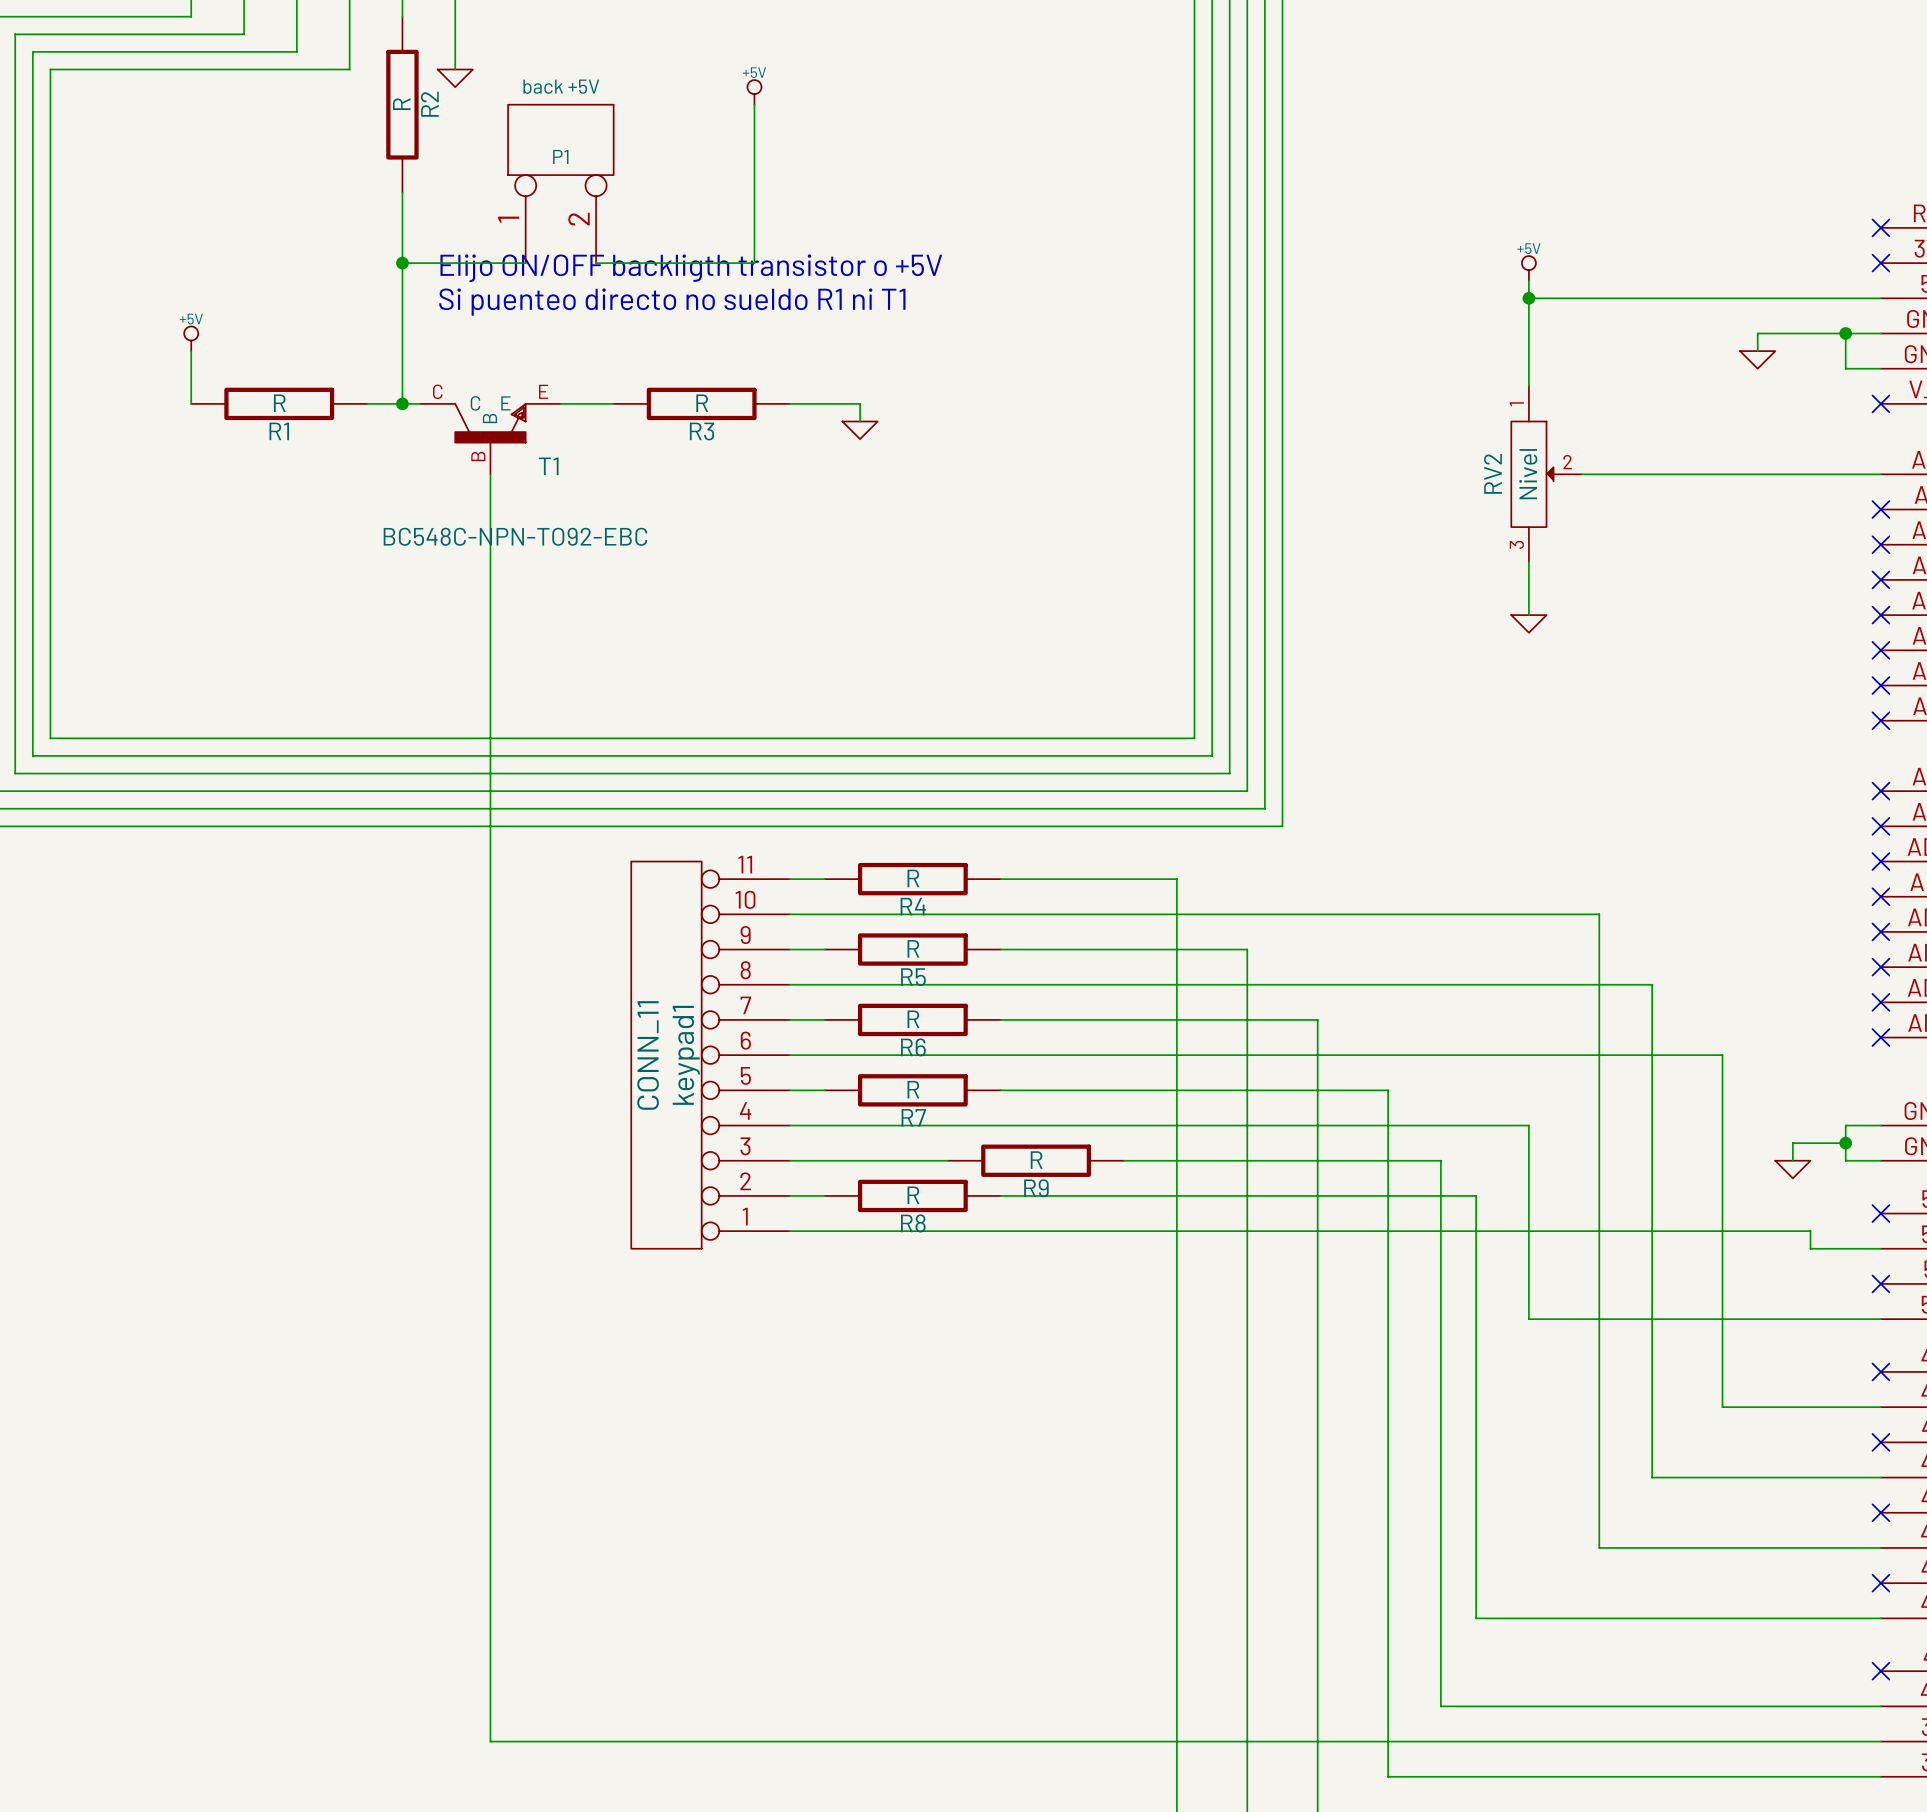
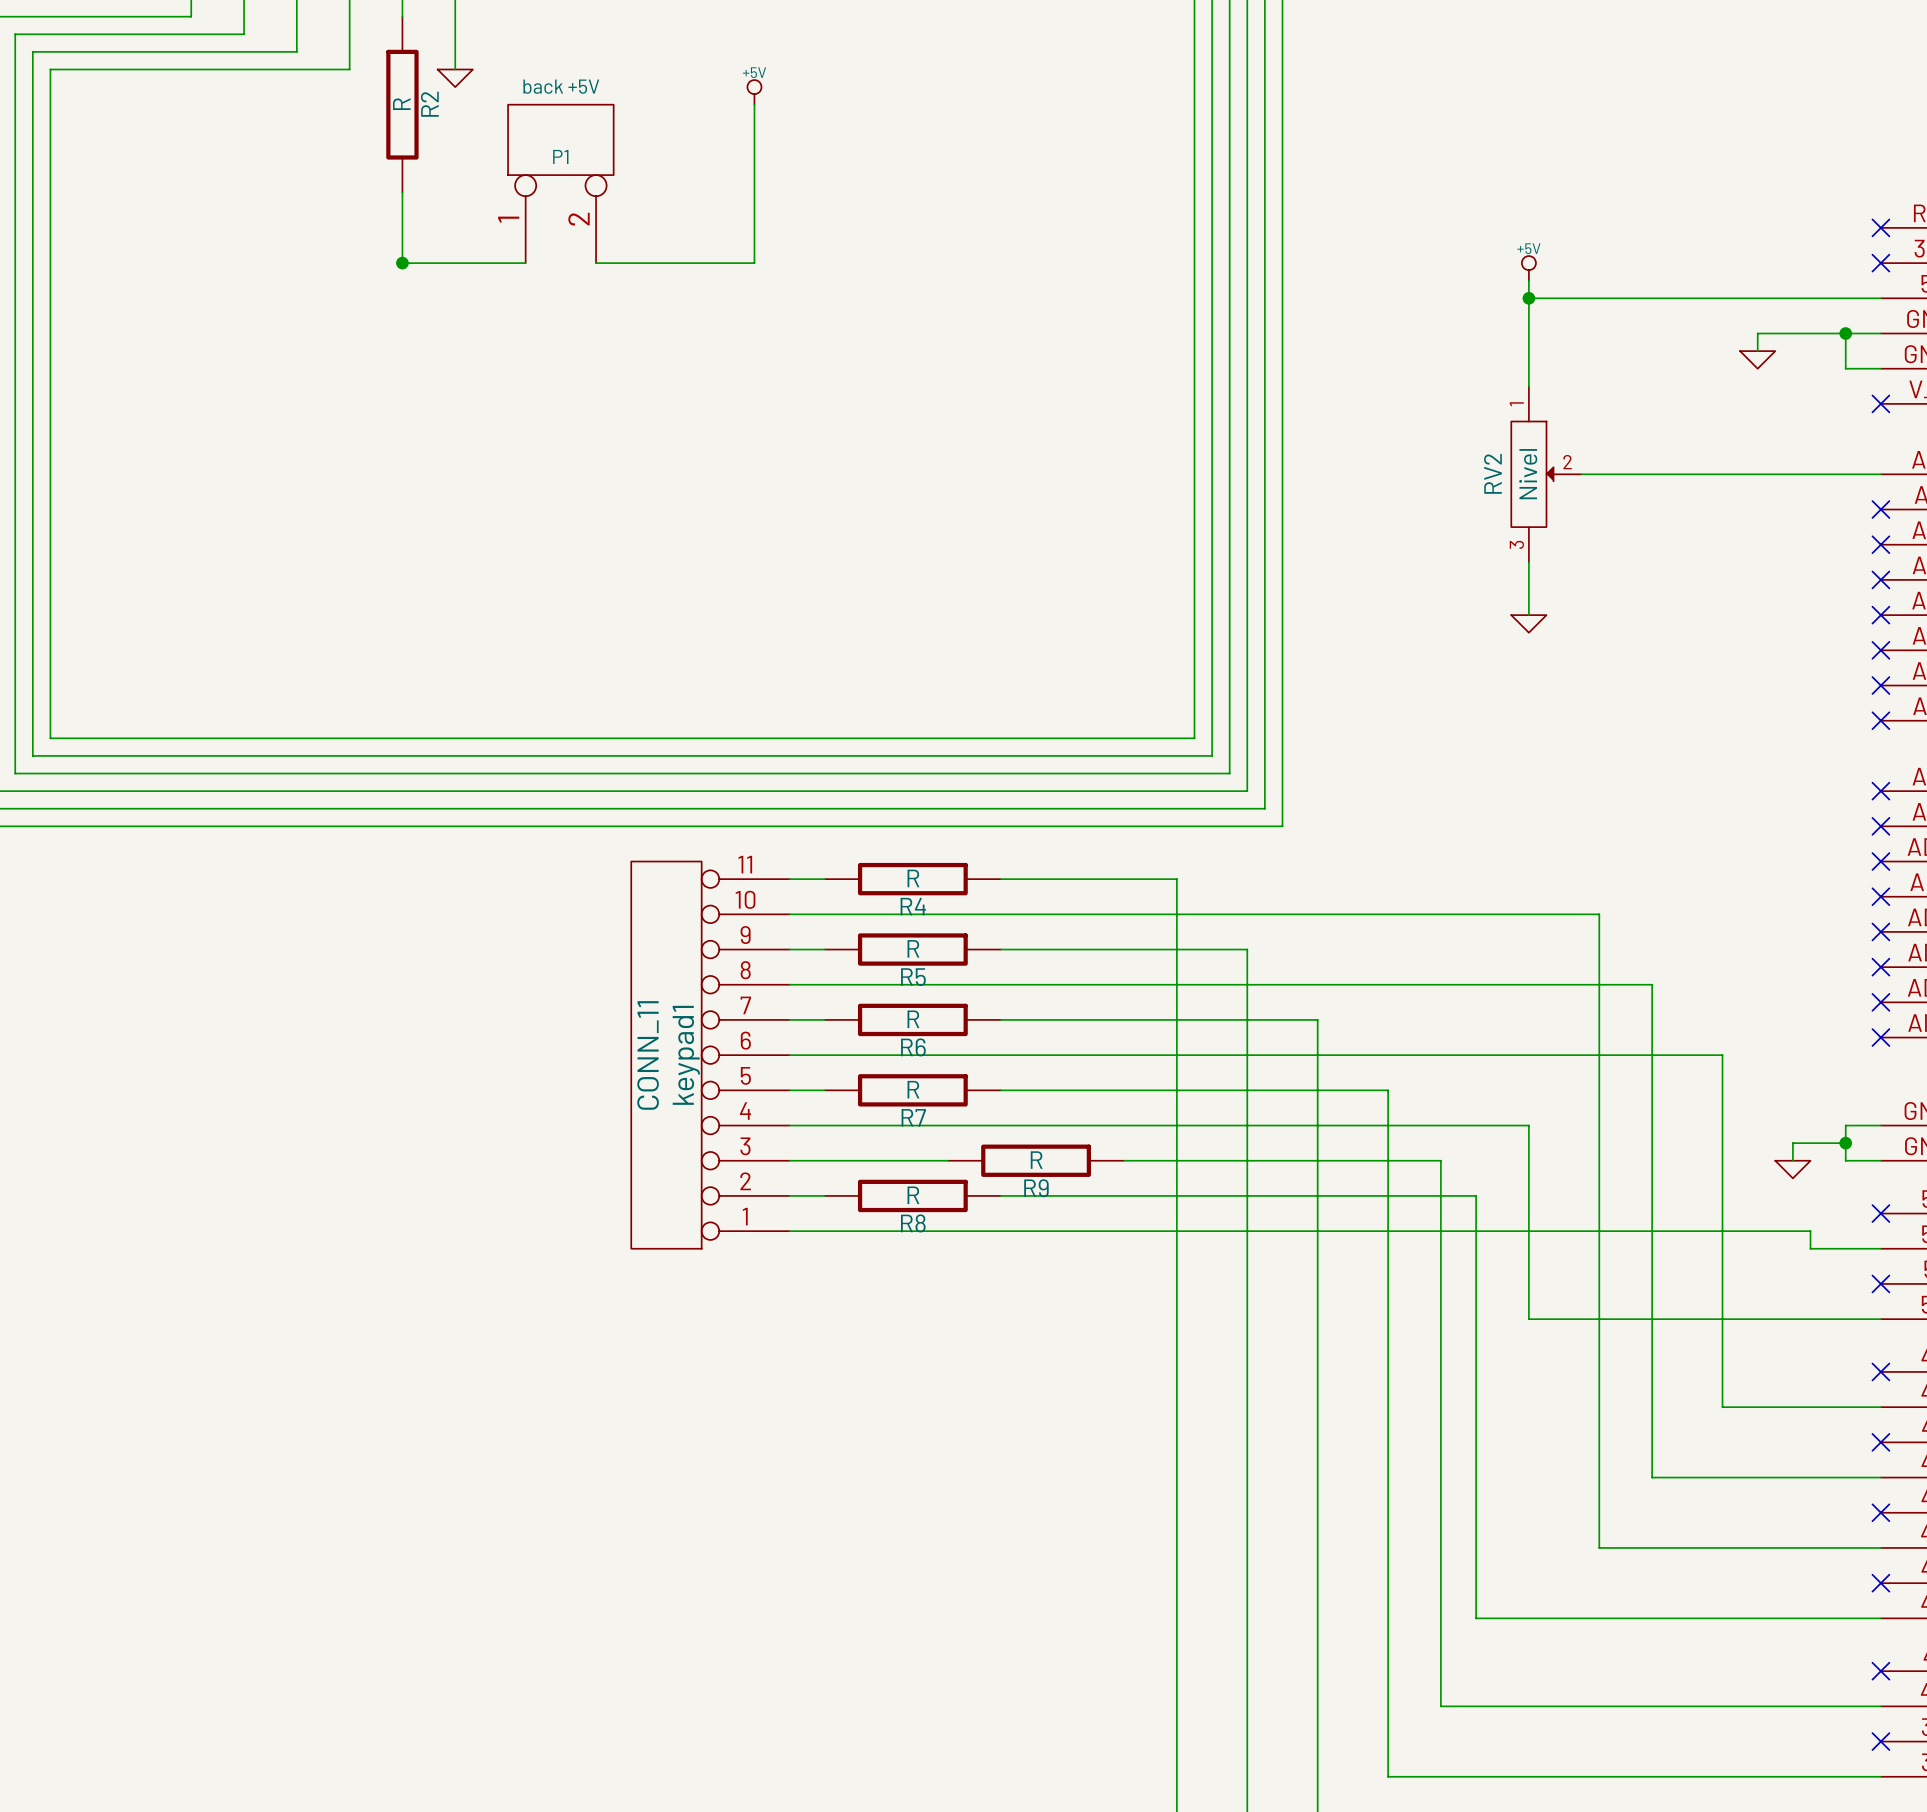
wire: (402, 263) (402, 403) -> none
text: Elijo ON/OFF backligth transistor o +5V (691, 268) -> none
text: Si puenteo directo no sueldo R1 ni T1 (672, 302) -> none
power symbol: +5V (191, 338) -> none
wire: (191, 351) (191, 403) -> none
R1: R (279, 403) -> none
wire: (367, 403) (420, 403) -> none
junction: (402, 403) -> none
wire: (560, 403) (613, 403) -> none
R3: R (701, 403) -> none
wire: (789, 403) (860, 403) (860, 421) -> none
power symbol: (860, 430) -> none
T1: BC548C-NPN-TO92-EBC (490, 439) -> none
wire: (490, 474) (490, 1741) (1880, 1741) -> none
no-connect mark: none -> (1880, 1741)

